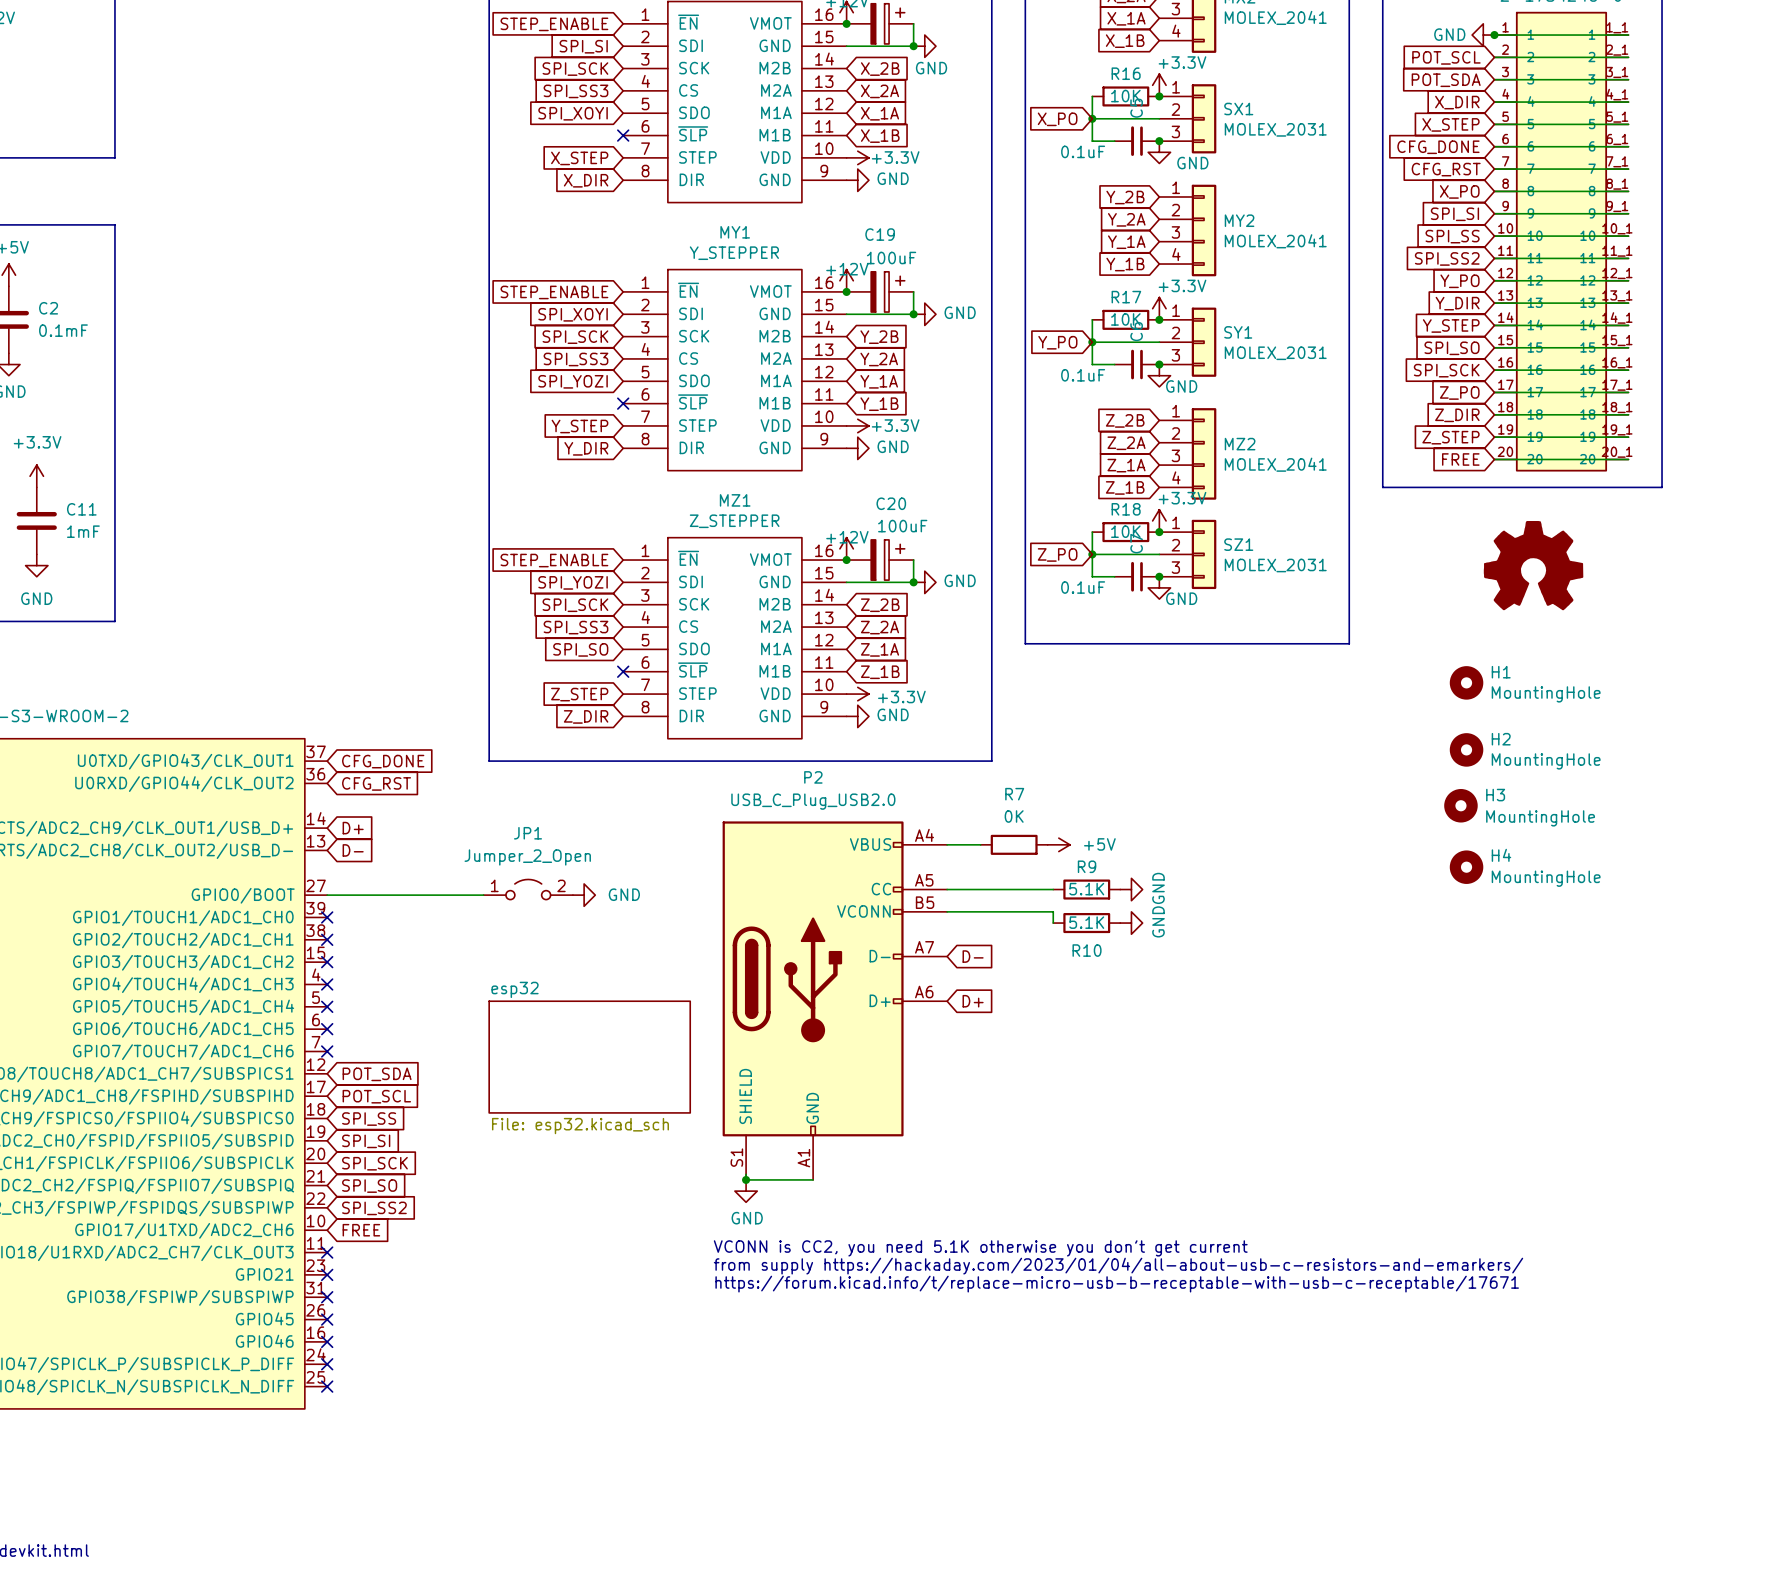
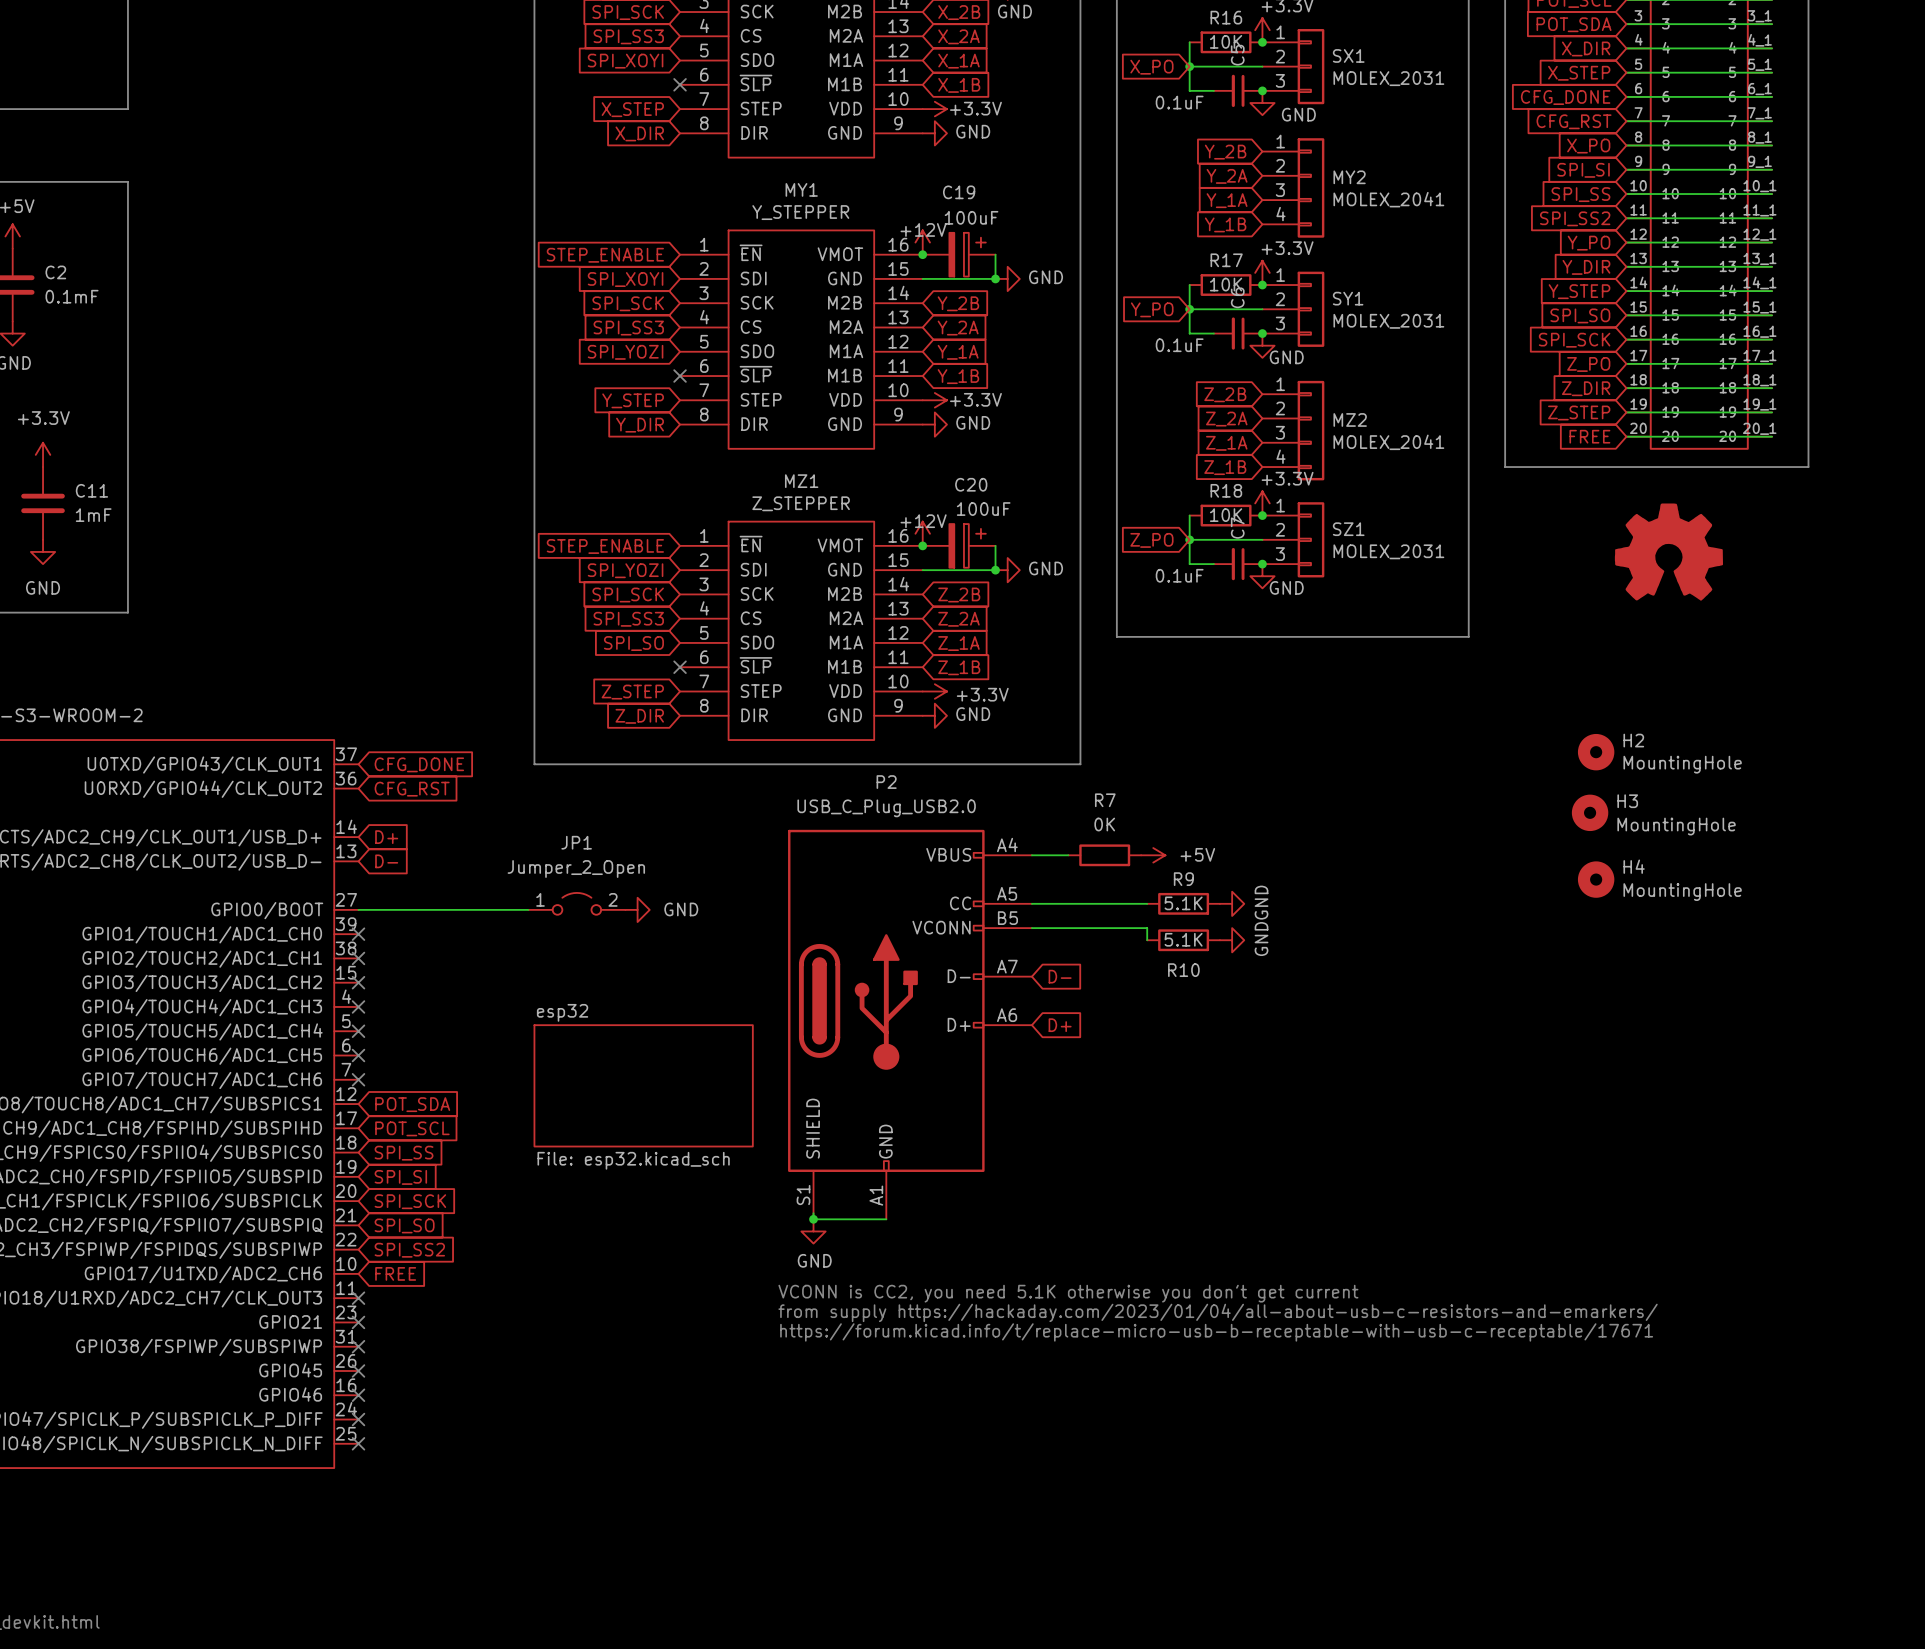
H1: MountingHole (1466, 682) -> none

